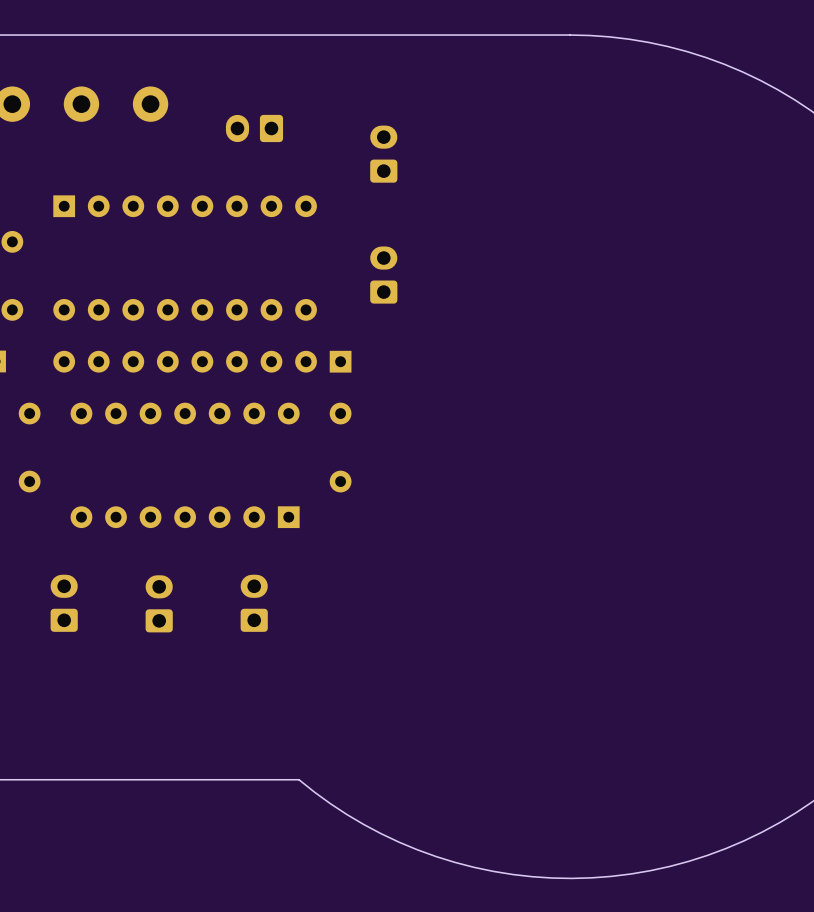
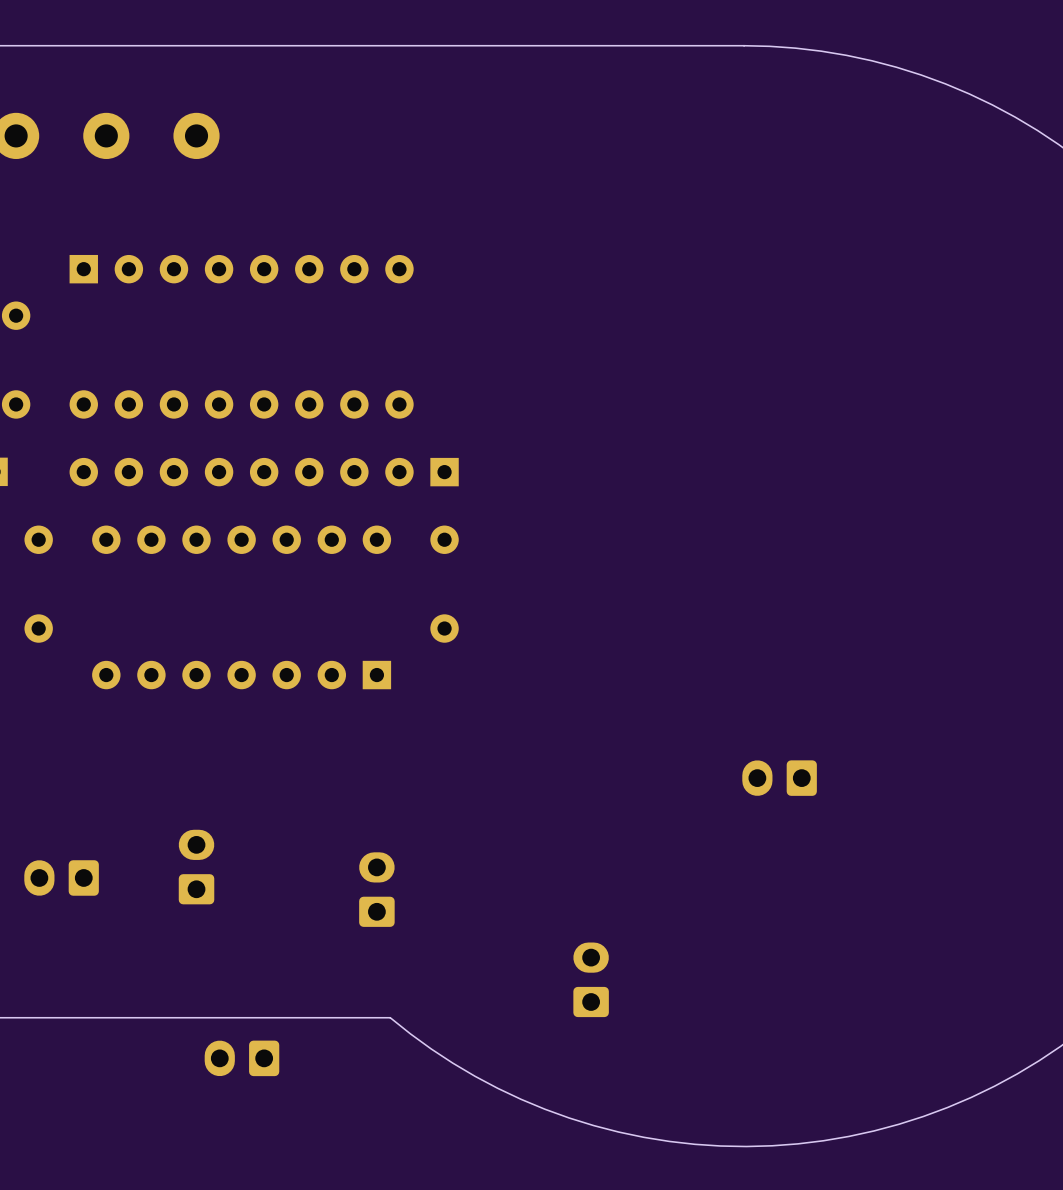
part: (254, 128) -> none
part: (383, 154) -> none
part: (383, 275) -> none
part: none -> (779, 778)
part: (64, 603) -> none
part: (159, 603) -> none
part: (254, 603) -> none
part: none -> (196, 867)
part: none -> (61, 877)
part: none -> (376, 889)
part: none -> (591, 979)
part: none -> (241, 1058)

